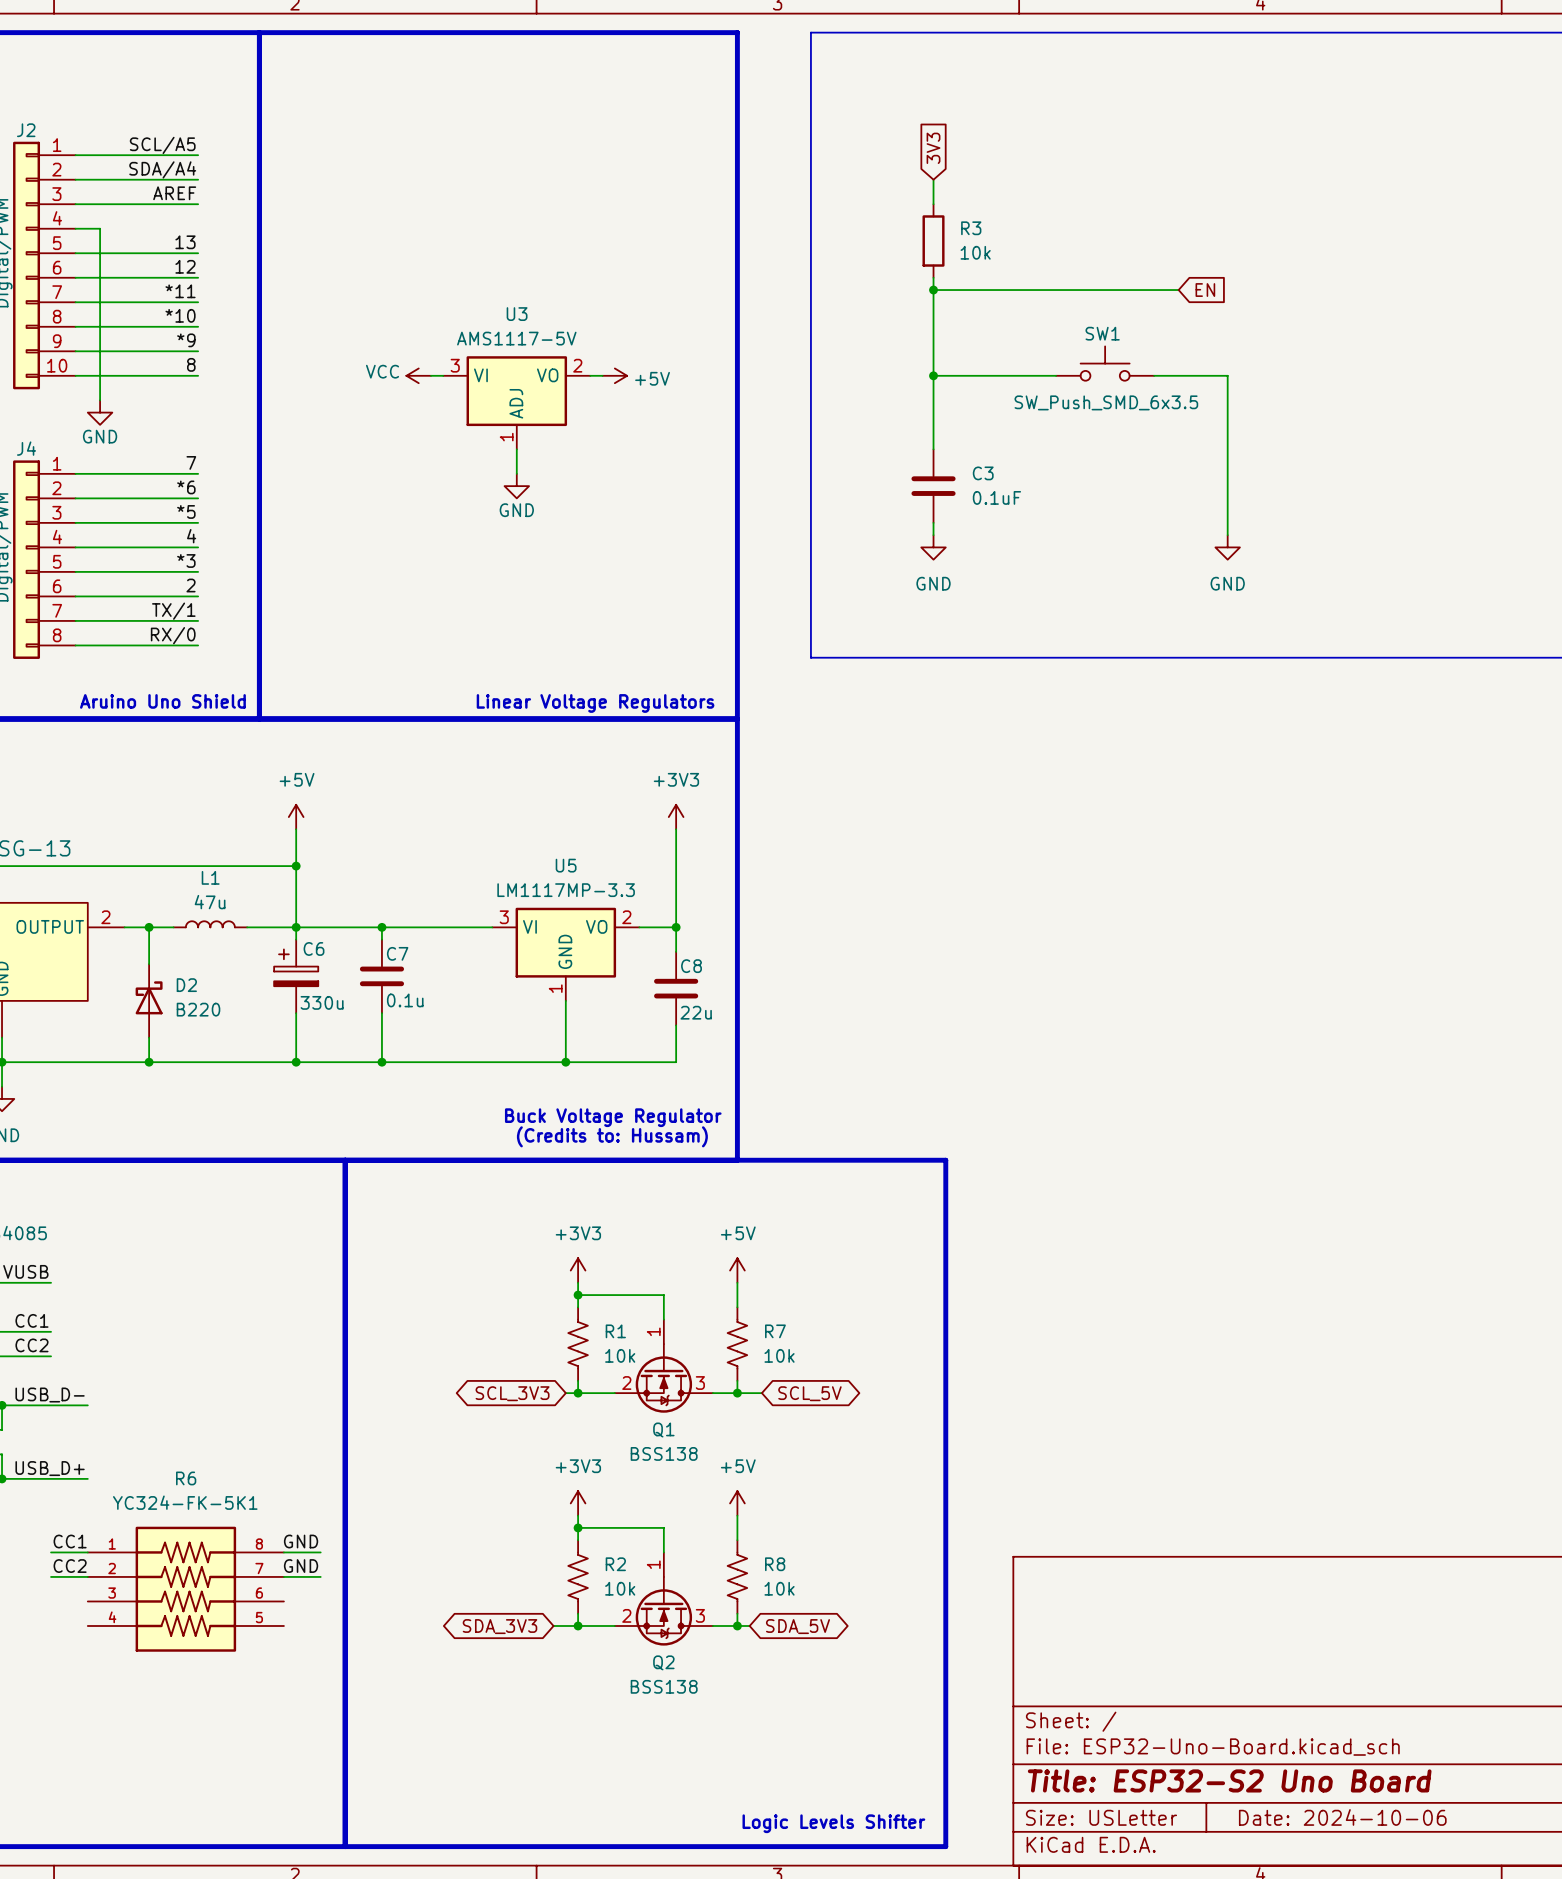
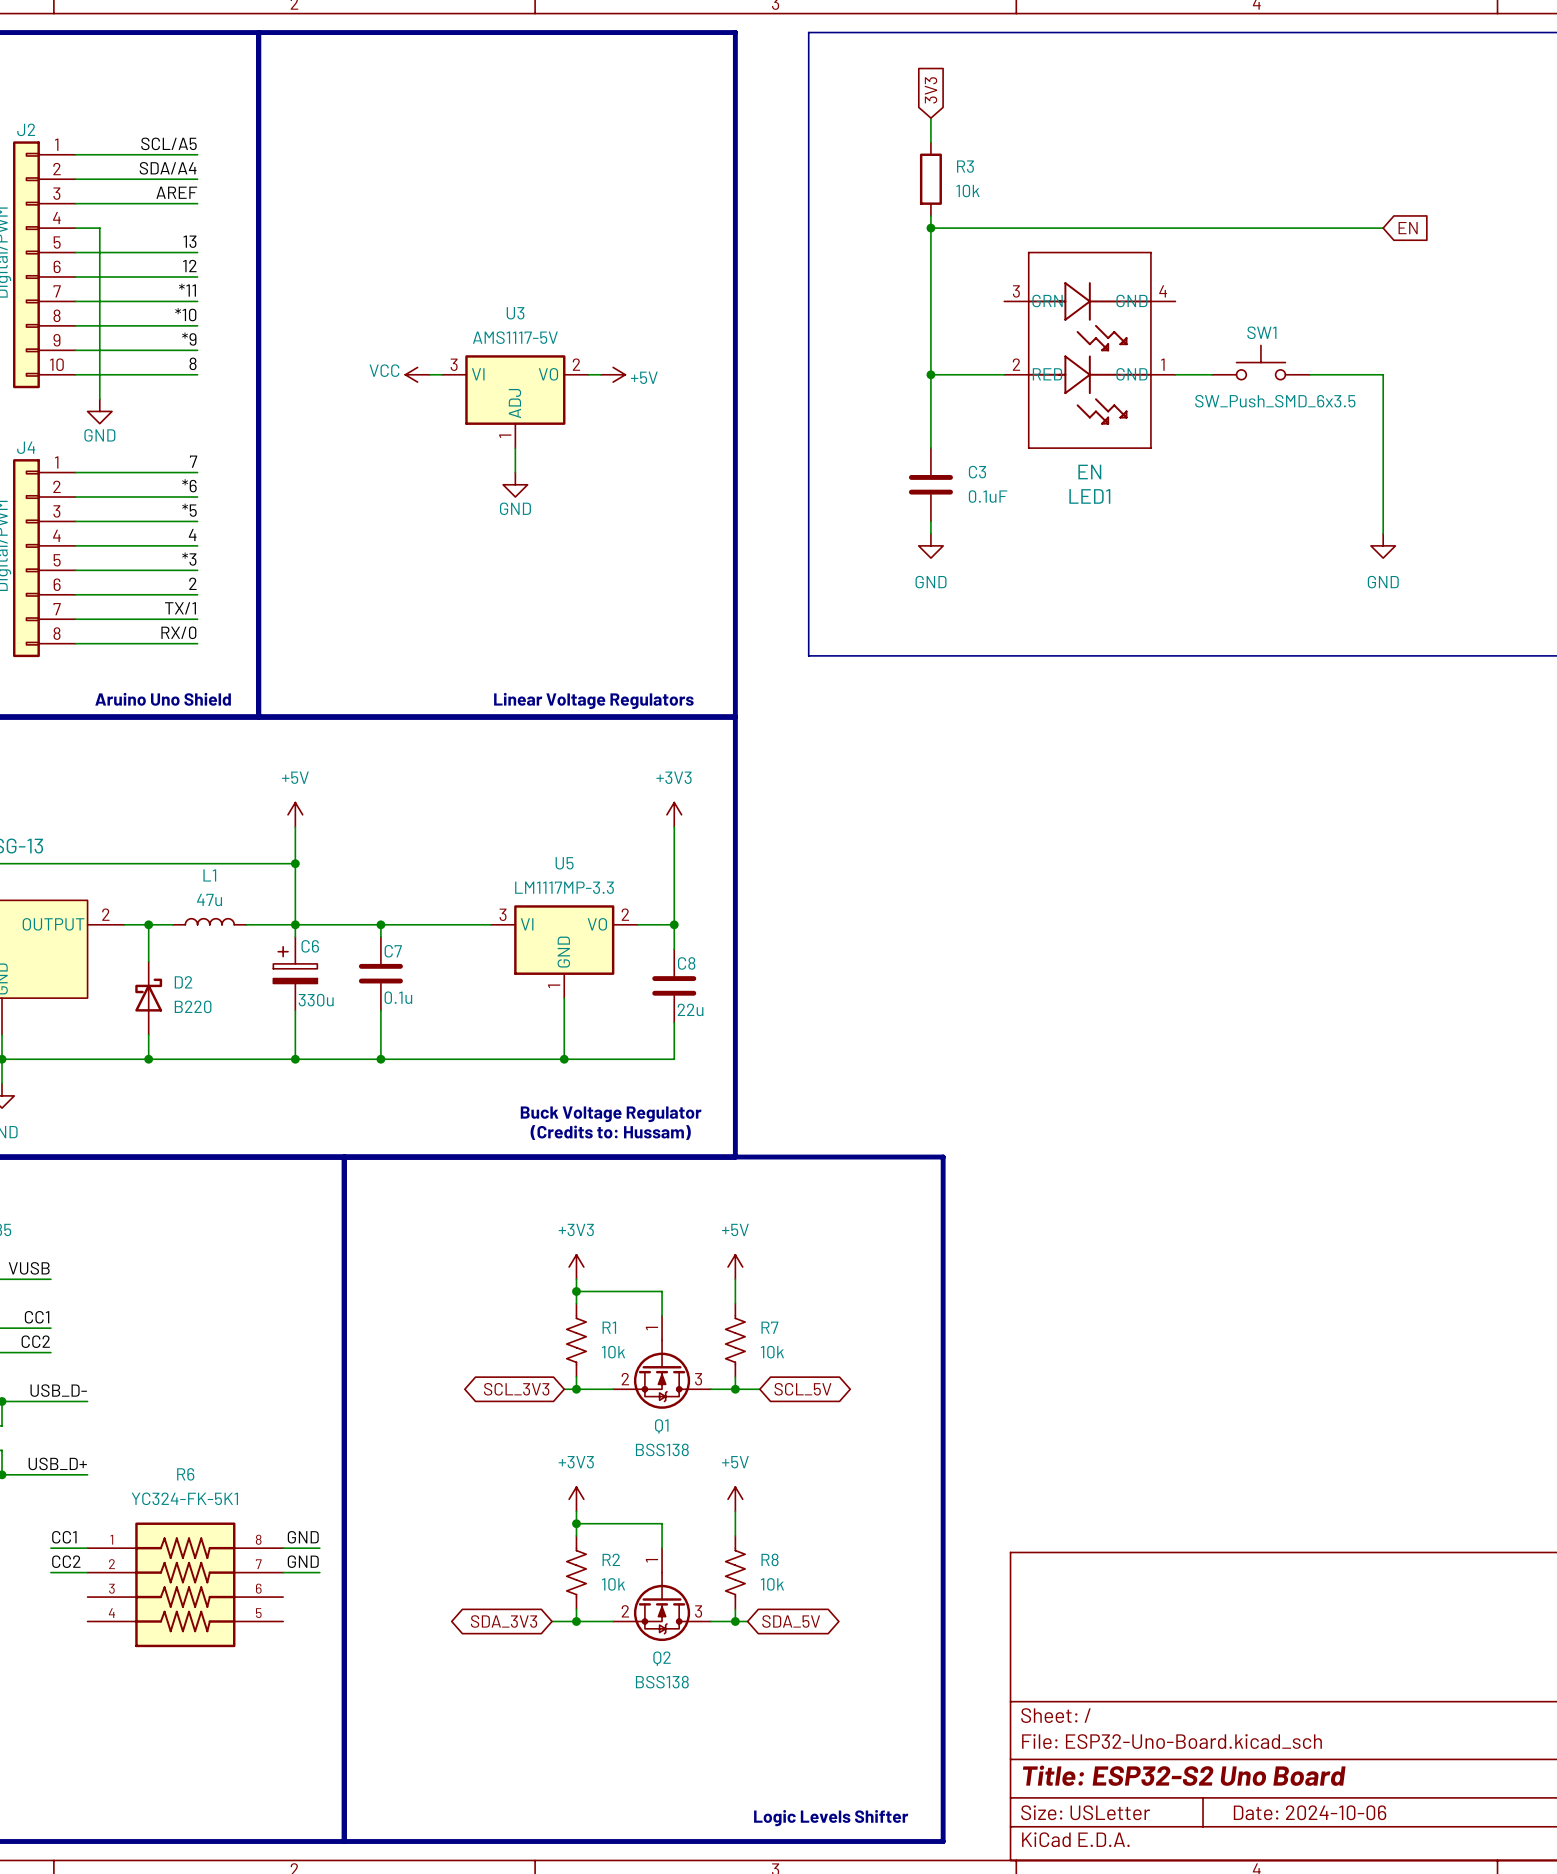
global label position: 3V3 (933, 148) -> 3V3 (931, 90)
wire: (933, 179) (933, 204) -> (930, 118) (930, 142)
wire: none -> (930, 215) (930, 276)
wire: none -> (930, 228) (1383, 228)
junction: none -> (930, 228)
R3 position: (933, 240) -> (930, 179)
wire: (933, 290) (1178, 290) -> none
junction: (933, 290) -> none
global label position: EN (1205, 290) -> EN (1408, 228)
LED1: none -> EN (1089, 350)
SW1 position: (1105, 363) -> (1260, 362)
wire: (1215, 375) (1227, 375) (1227, 535) -> none
wire: none -> (1309, 374) (1383, 374) (1383, 533)
power symbol position: GND (1227, 547) -> GND (1383, 545)

